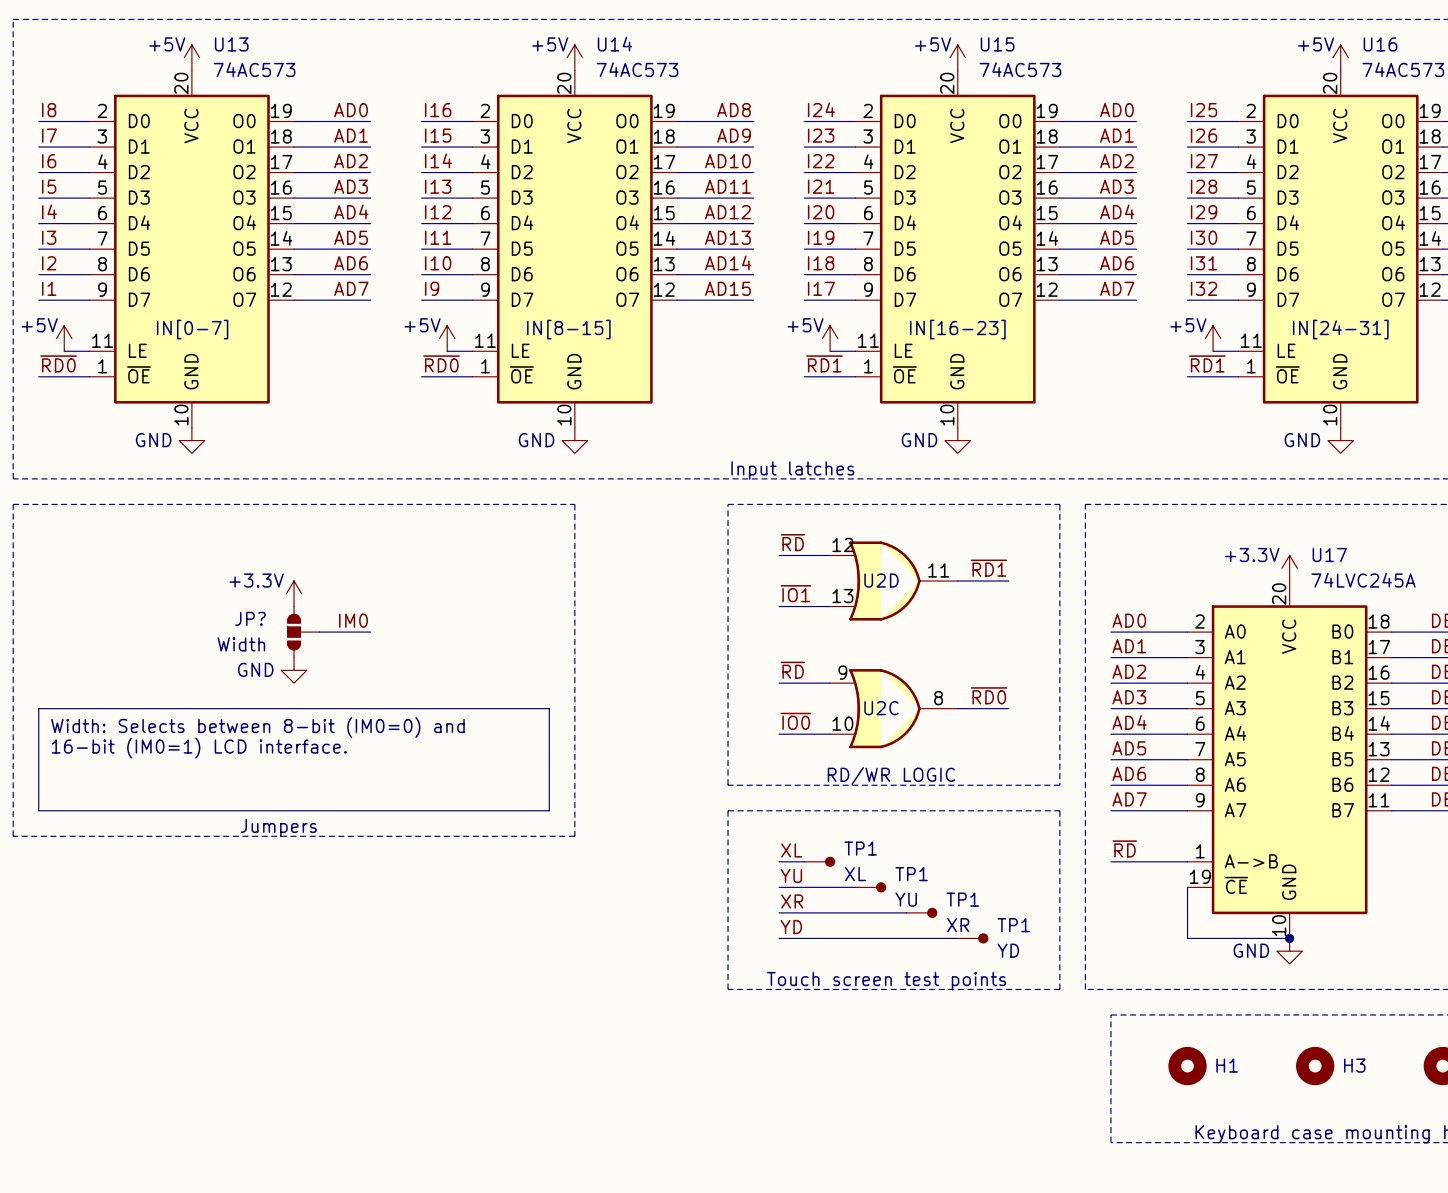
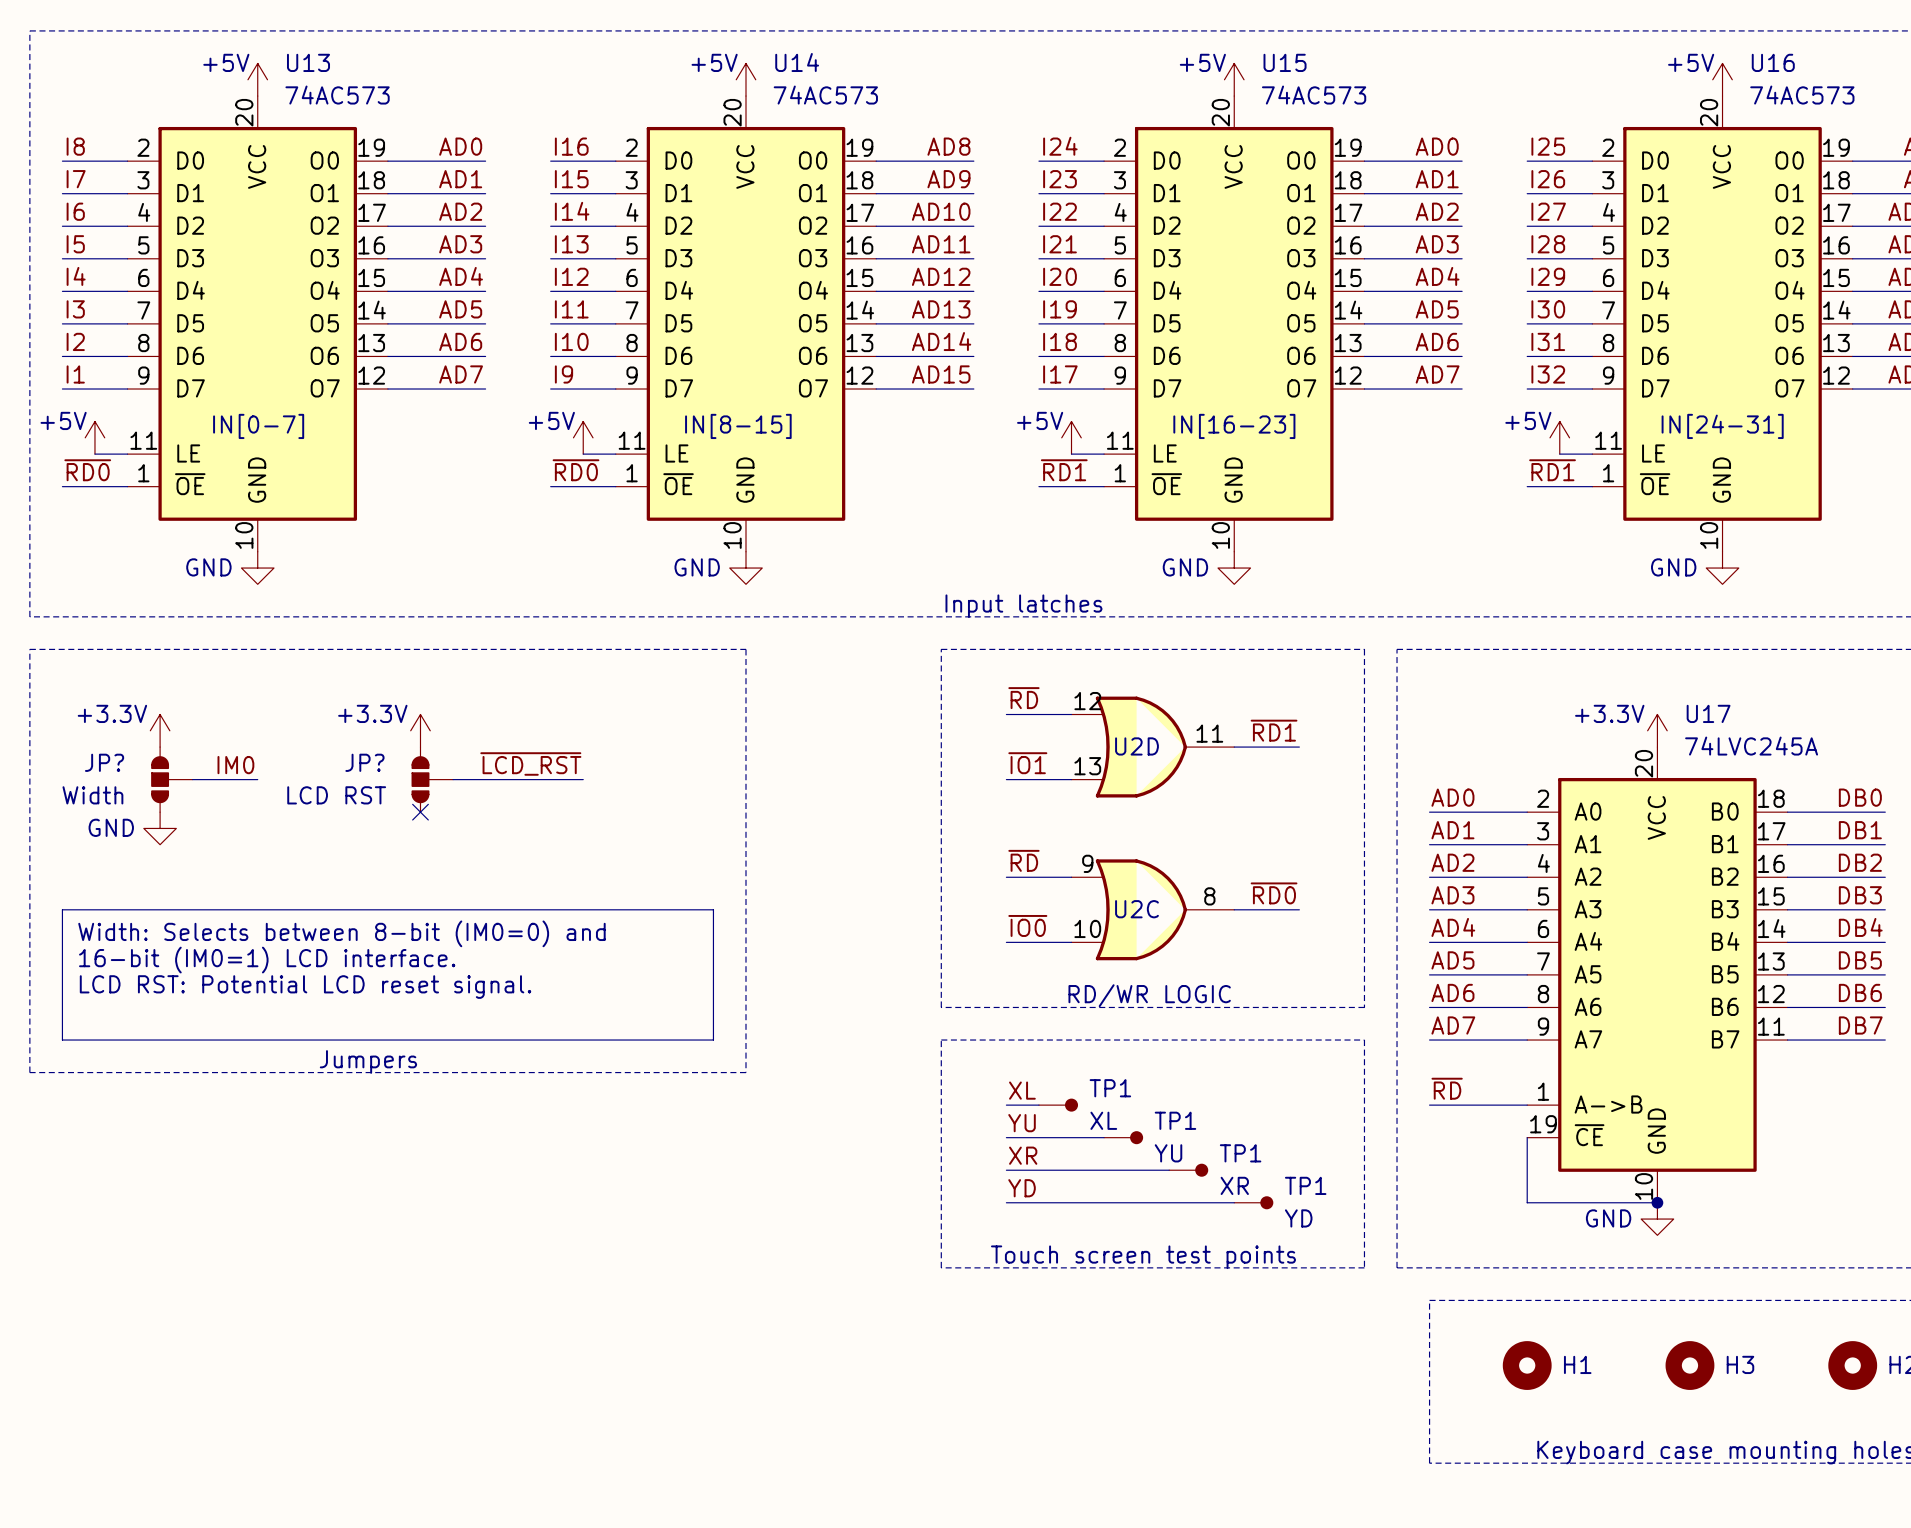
power symbol: none -> +3.3V (160, 730)
power symbol position: +3.3V (294, 593) -> +3.3V (420, 730)
label: none -> ~{LCD_RST} (530, 763)
JP?: none -> LCD RST (432, 779)
wire: none -> (453, 779) (583, 779)
label position: IM0 (353, 620) -> IM0 (235, 765)
JP? position: (303, 632) -> (171, 779)
wire: (319, 632) (370, 632) -> (192, 779) (257, 779)
no-connect mark: none -> (420, 812)
power symbol position: GND (294, 670) -> GND (160, 828)
text: none -> LCD RST: Potential LCD reset signal. (305, 987)

